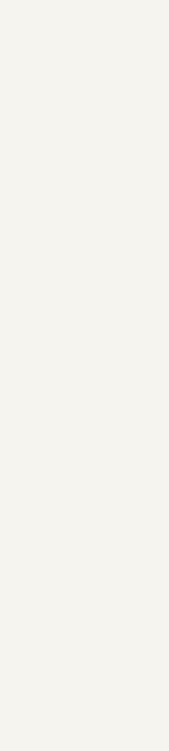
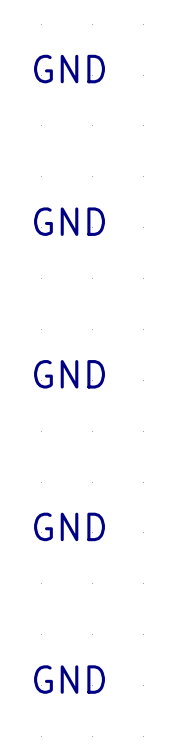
text: none -> GND (69, 69)
text: none -> GND (69, 221)
text: none -> GND (69, 374)
text: none -> GND (69, 526)
text: none -> GND (69, 679)

